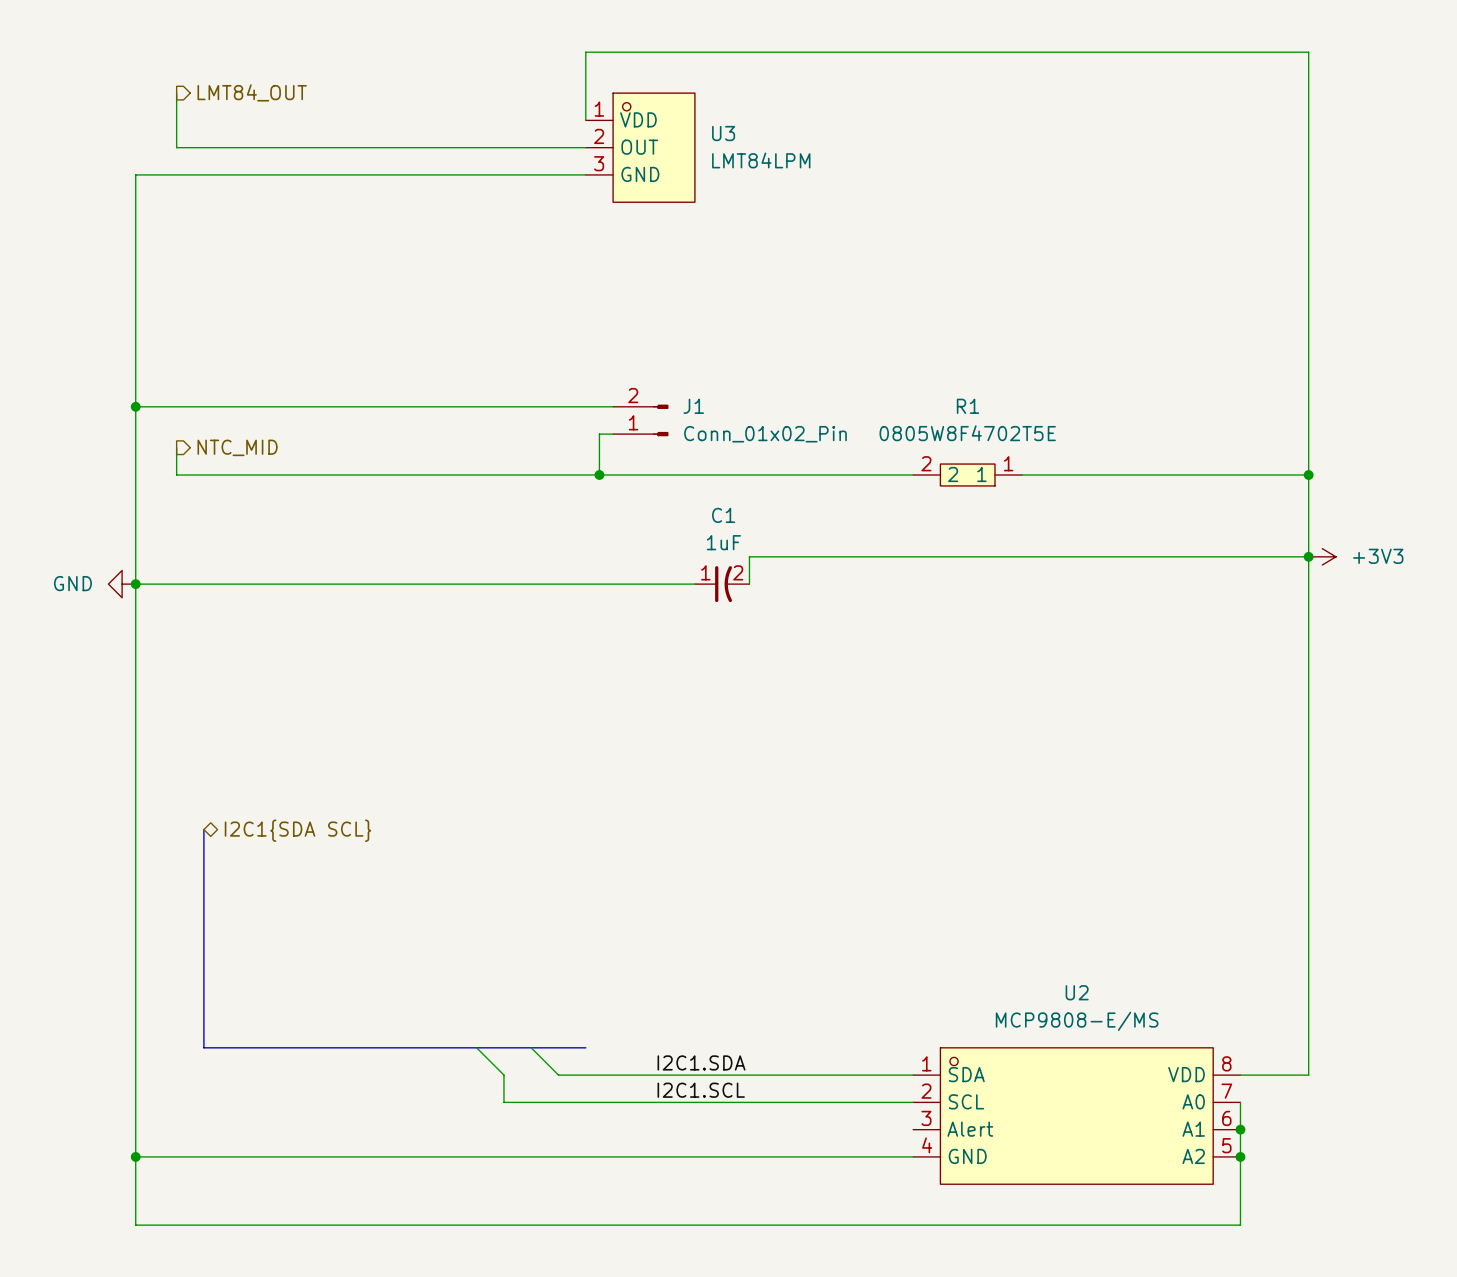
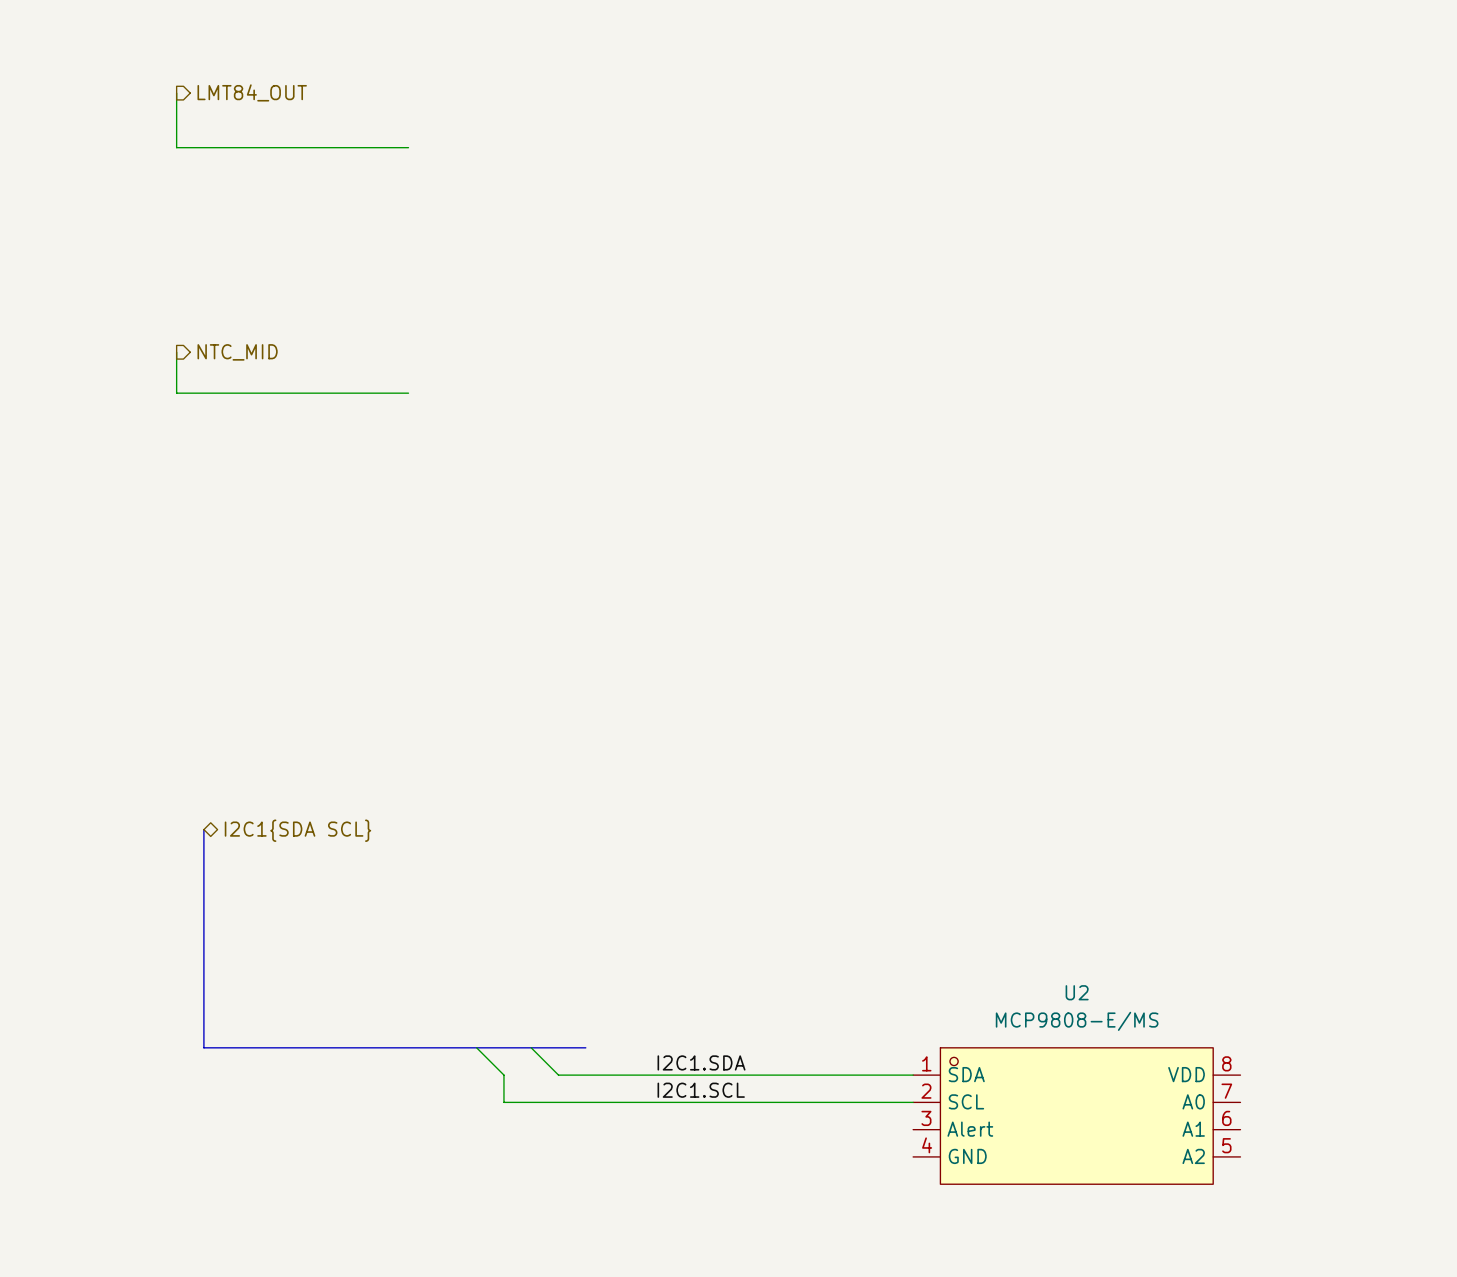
wire: (585, 120) (585, 52) (1308, 52) (1308, 1075) (1240, 1075) -> none
wire: (408, 147) (585, 147) -> none
U3: LMT84LPM (640, 147) -> none
wire: (585, 174) (135, 174) (135, 1225) (1240, 1225) (1240, 1102) -> none
wire: none -> (176, 352) (176, 393) (408, 393)
wire: (135, 406) (613, 406) -> none
junction: (135, 406) -> none
J1: Conn_01x02_Pin (640, 420) -> none
wire: (613, 434) (599, 434) (599, 475) -> none
wire: (176, 447) (176, 475) (913, 475) -> none
hierarchical label position: NTC_MID (237, 447) -> NTC_MID (237, 352)
junction: (599, 475) -> none
R1: 0805W8F4702T5E (967, 475) -> none
wire: (1022, 475) (1308, 475) -> none
junction: (1308, 475) -> none
wire: (1308, 556) (749, 556) (749, 584) -> none
junction: (1308, 556) -> none
power symbol: +3V3 (1322, 556) -> none
power symbol: GND (122, 584) -> none
wire: (135, 584) (694, 584) -> none
junction: (135, 584) -> none
C1: 1uF (722, 584) -> none
junction: (1240, 1129) -> none
wire: (135, 1156) (913, 1156) -> none
junction: (135, 1156) -> none
junction: (1240, 1156) -> none

